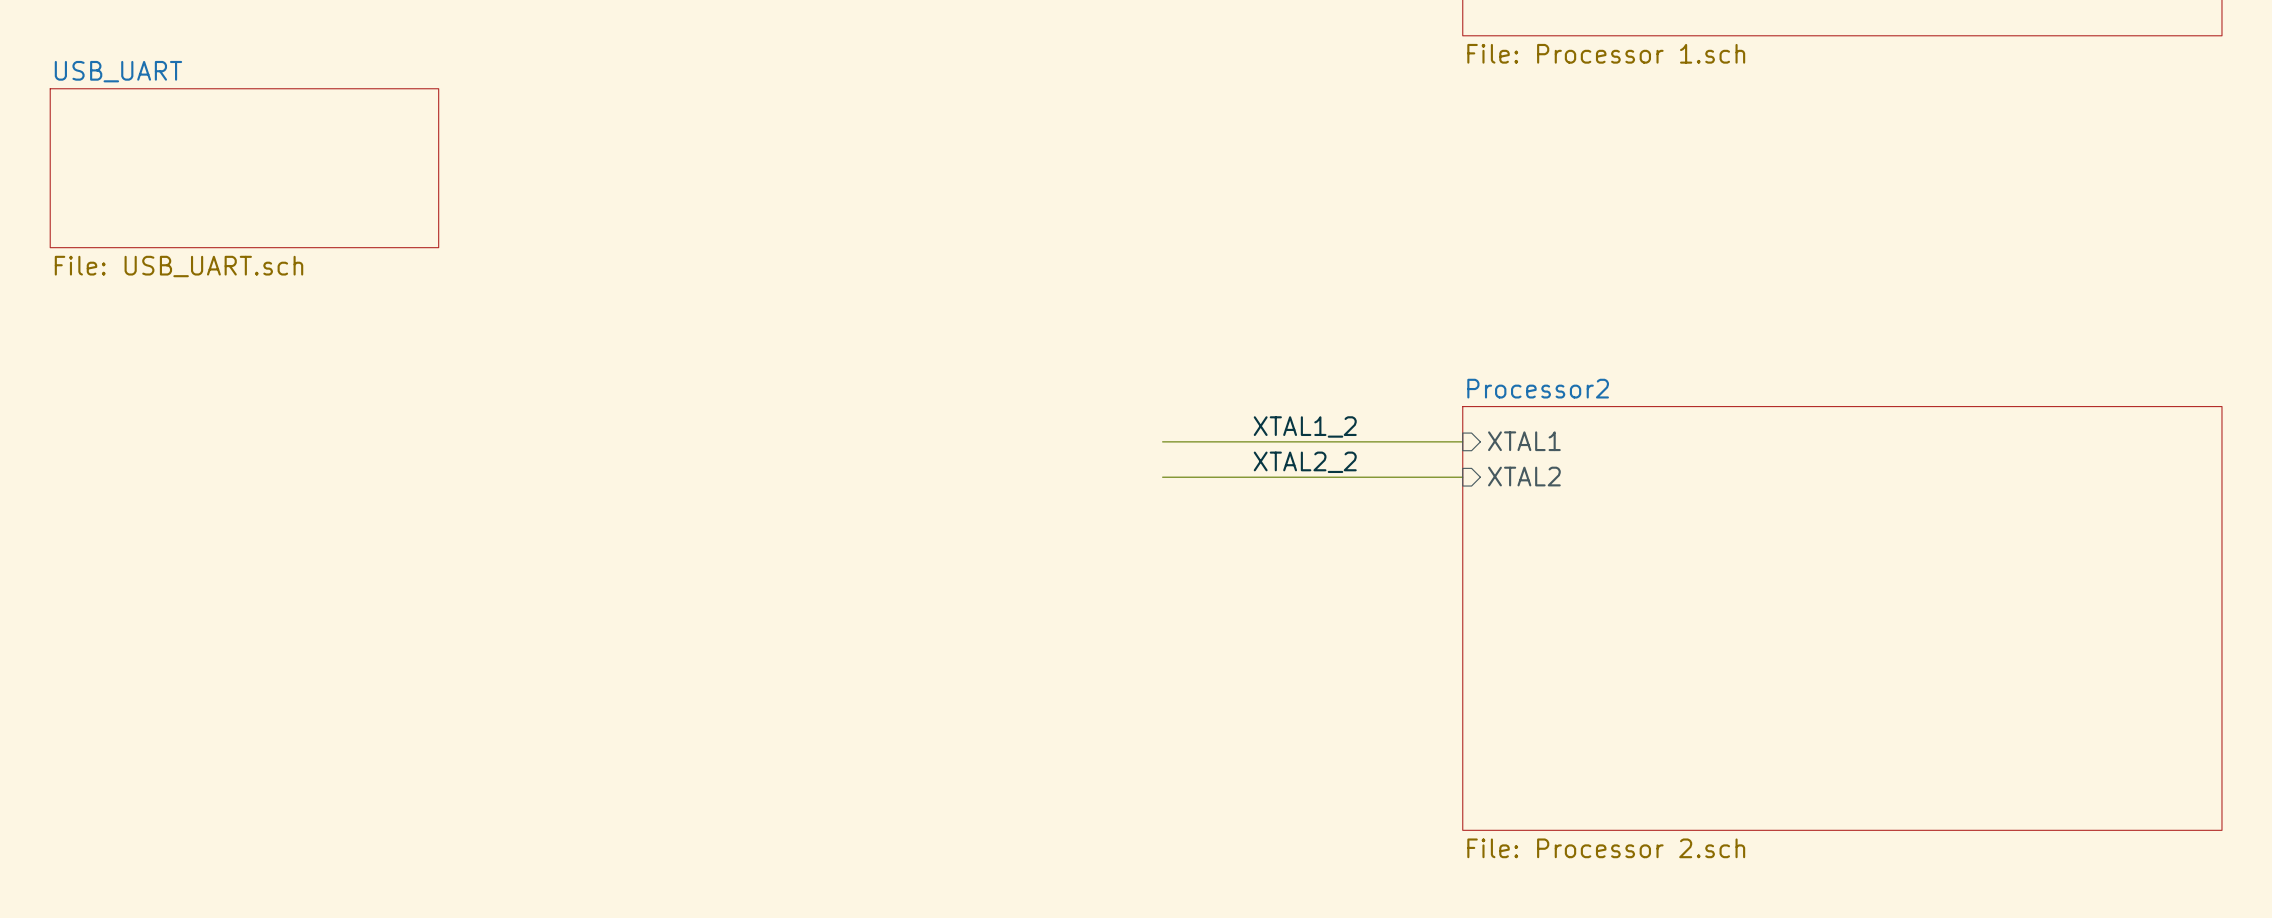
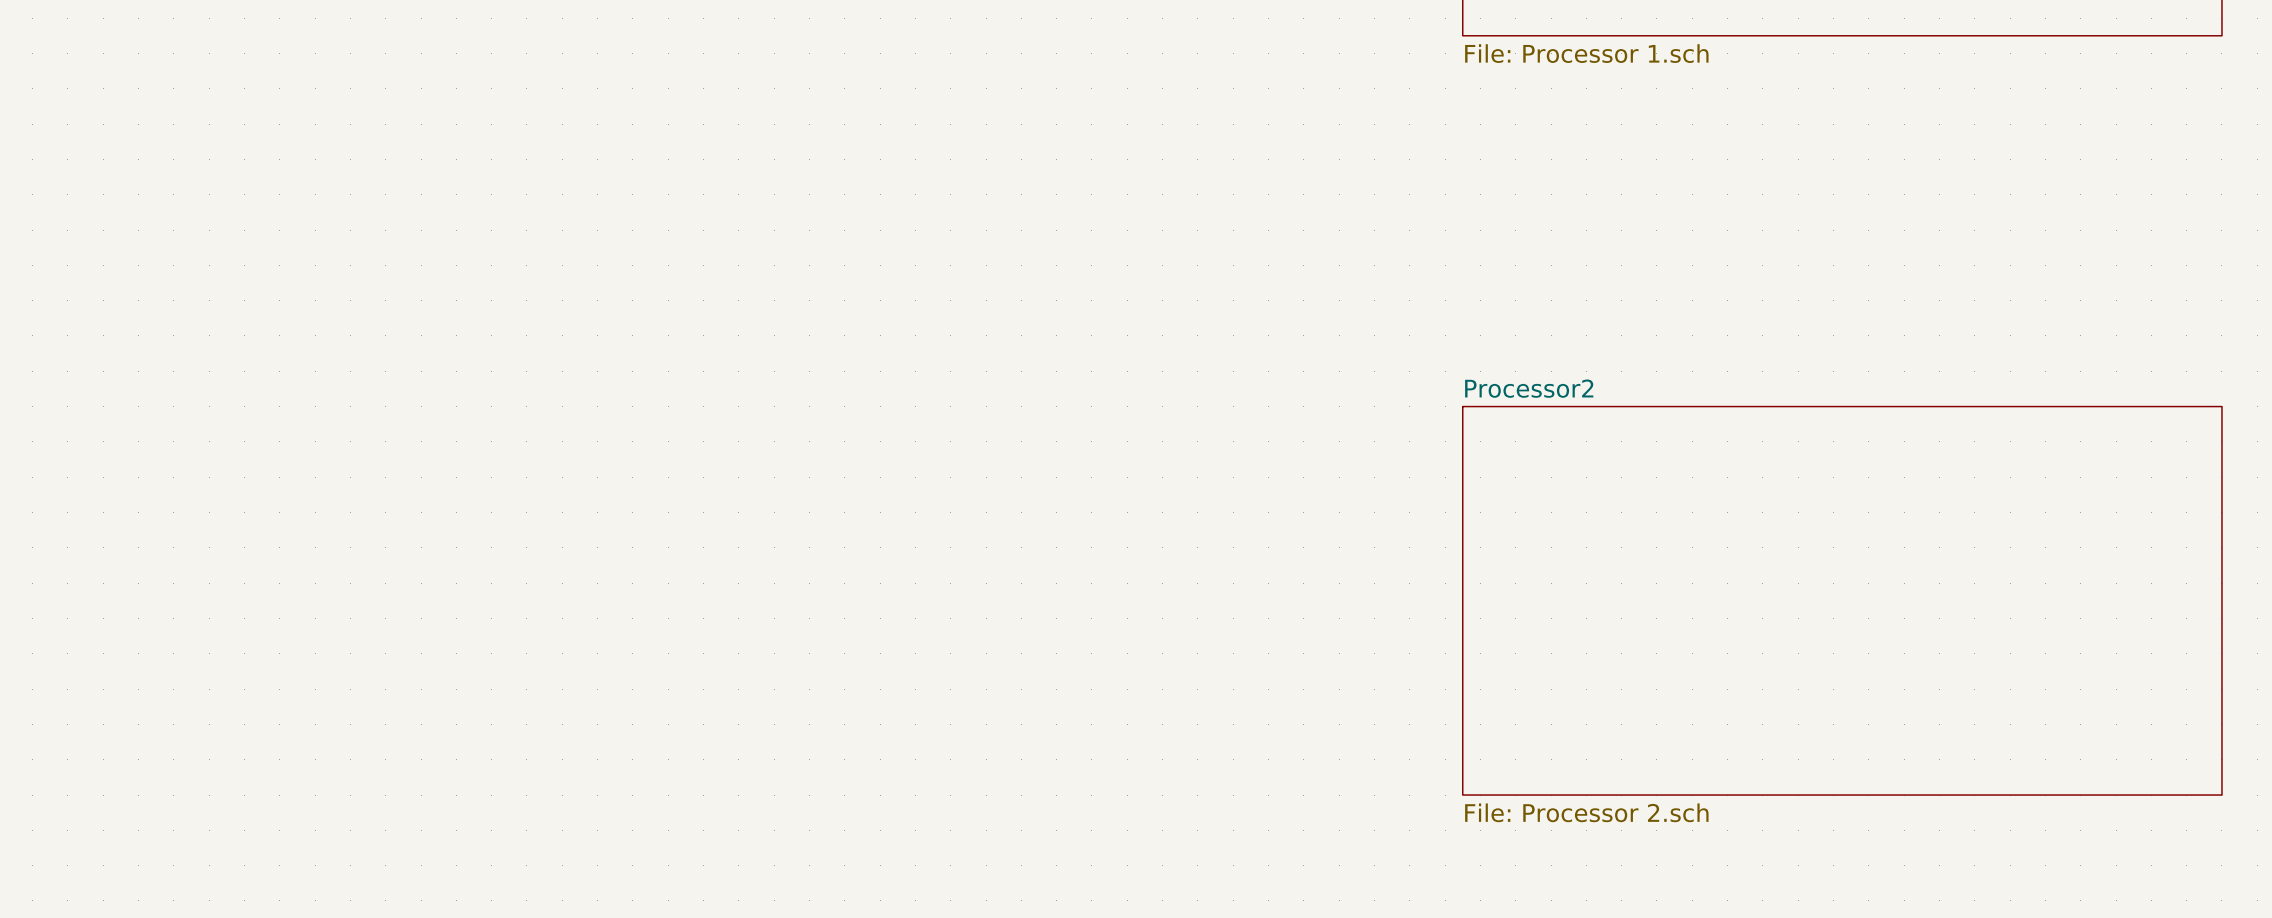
sheet USB_UART: File: USB_UART.sch (244, 168) -> none
sheet Processor2 shape: [1462, 406, 2222, 831] -> [1462, 406, 2222, 796]
label: XTAL1_2 (1305, 426) -> none
wire: (1162, 441) (1462, 441) -> none
sheet pin: XTAL1 (1524, 441) -> none
label: XTAL2_2 (1305, 462) -> none
sheet pin: XTAL2 (1524, 476) -> none
wire: (1162, 477) (1462, 477) -> none

